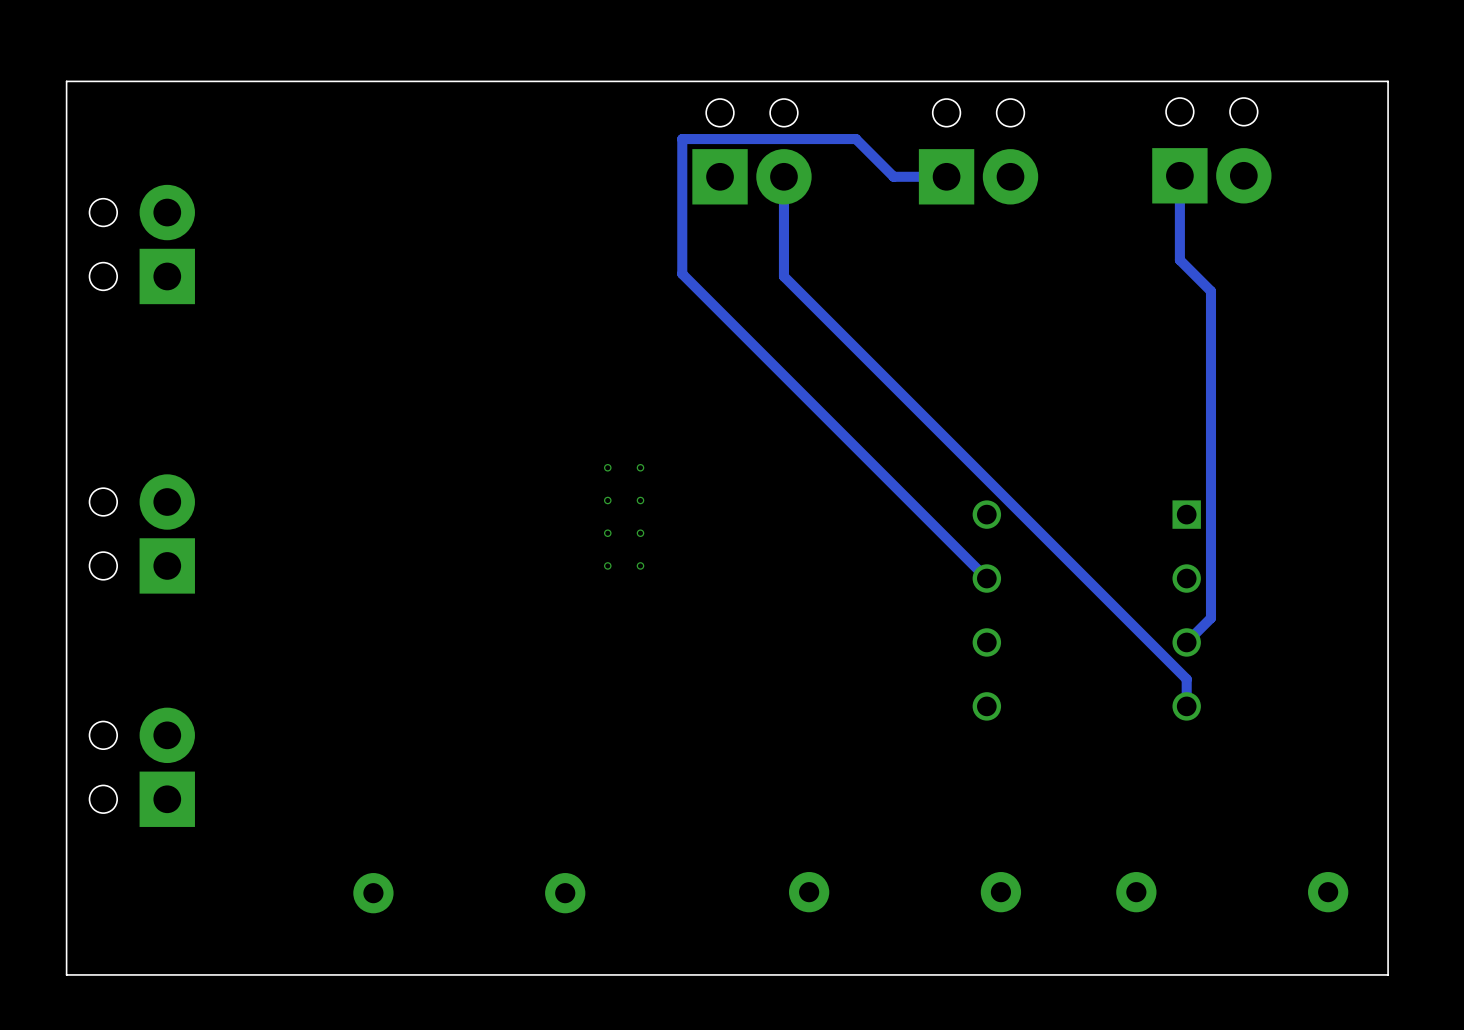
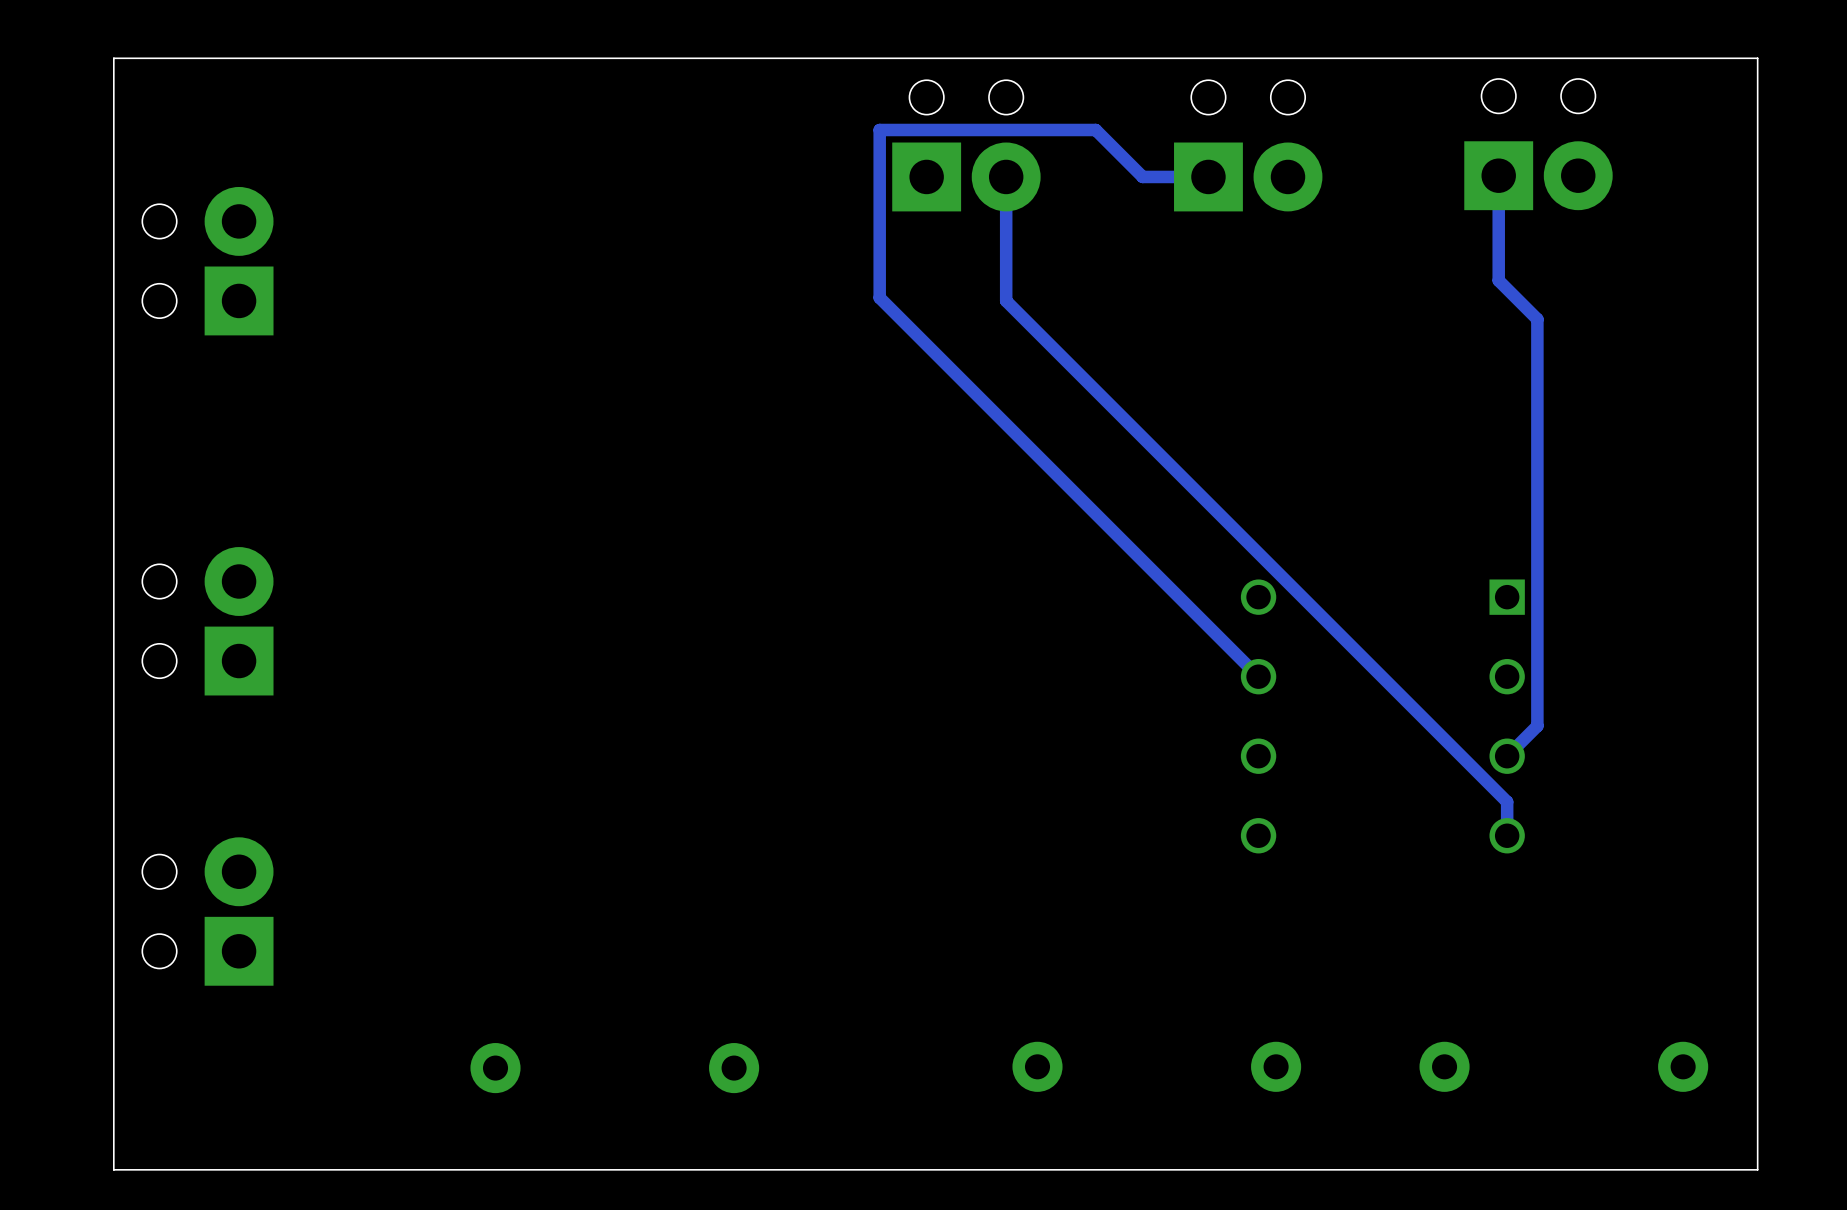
part: (624, 516) -> none

